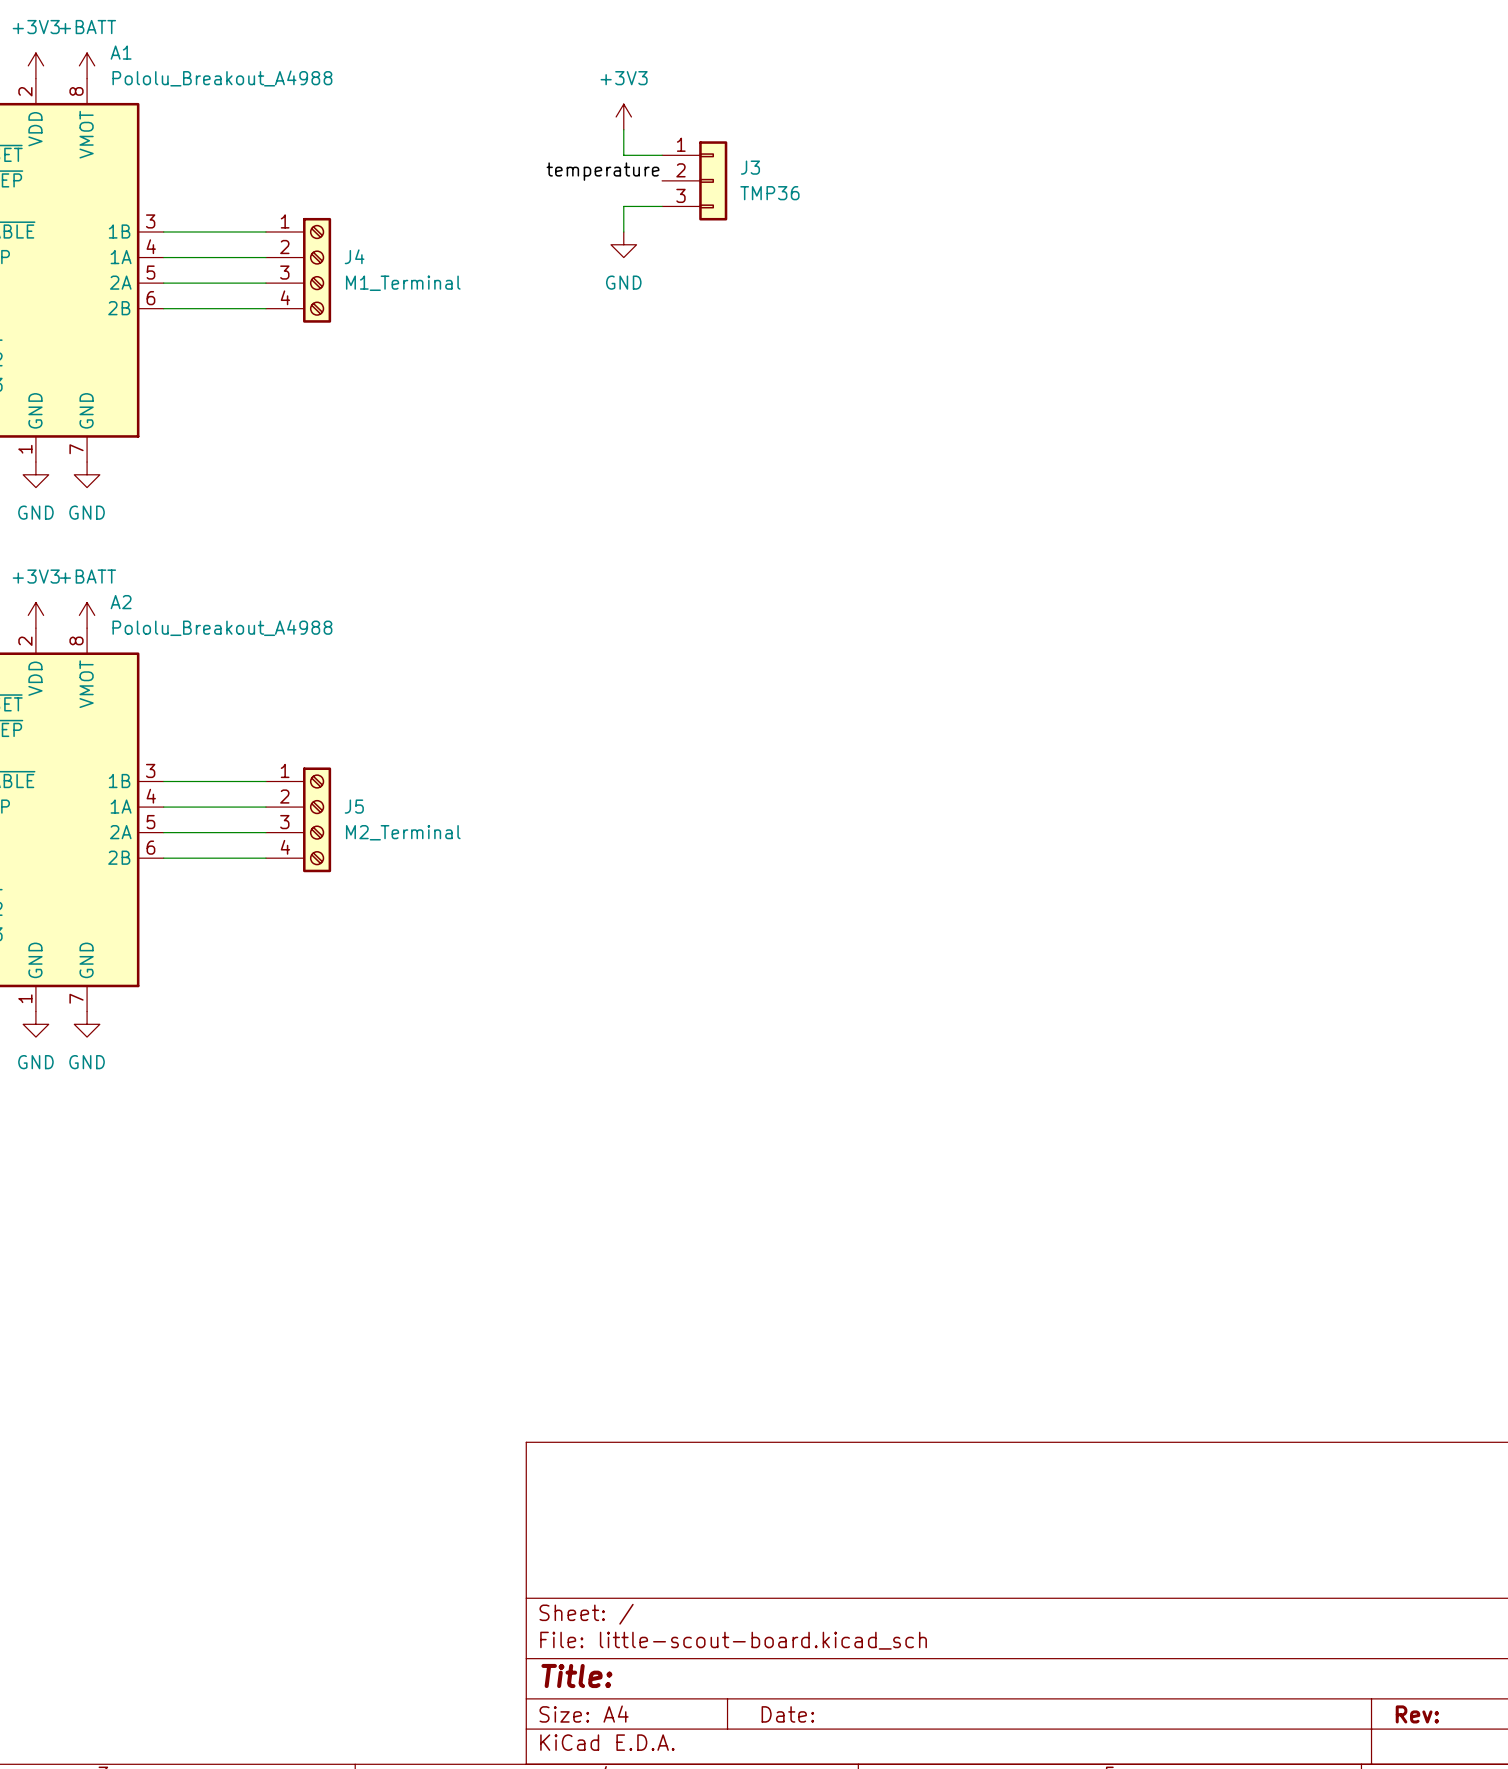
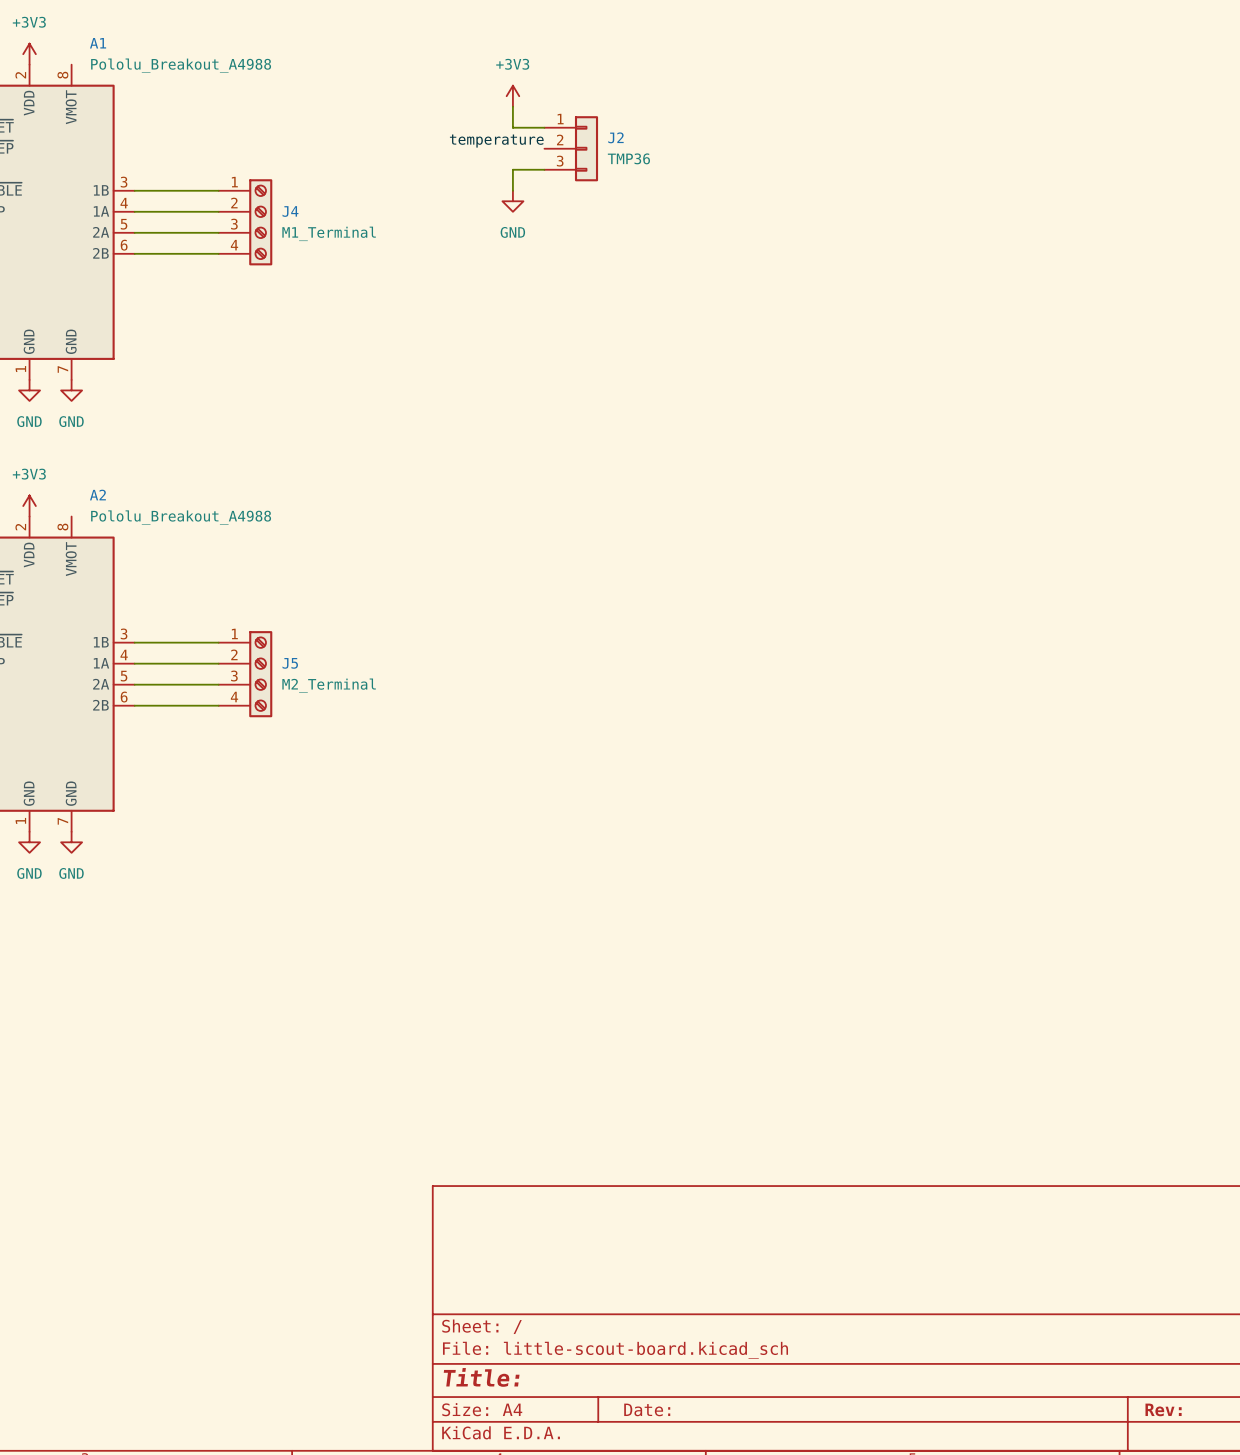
power symbol: +BATT (87, 65) -> none
J3 name: J3 (750, 167) -> J2 (615, 137)
power symbol: +BATT (87, 615) -> none

